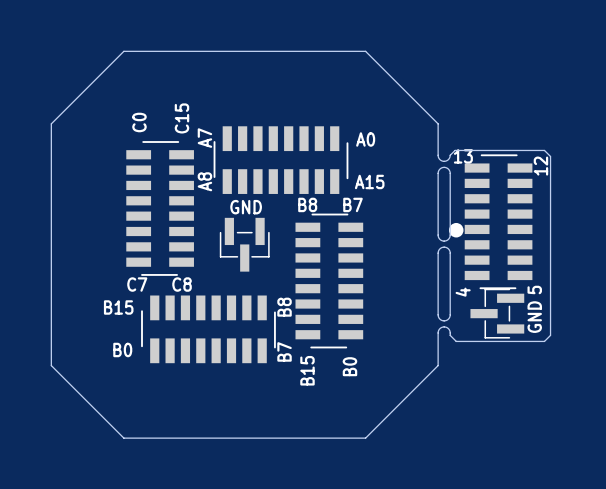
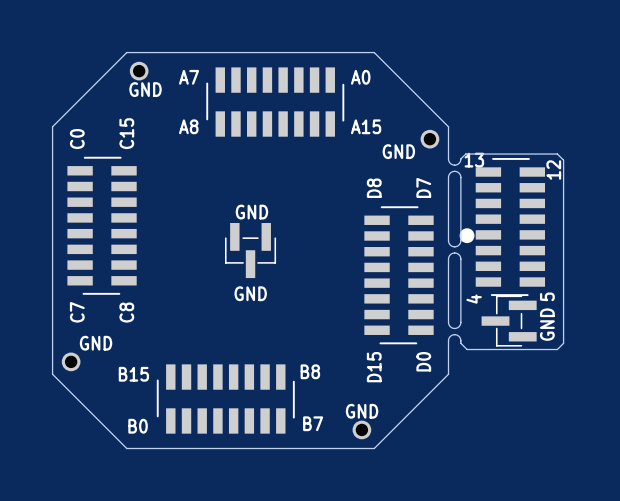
part: none -> (139, 71)
text: none -> GND (145, 89)
text position: C15 (181, 118) -> C15 (126, 133)
text position: C0 (139, 122) -> C0 (77, 139)
part: none -> (429, 139)
text rotation: 0° (204, 138) -> 90° clockwise (189, 77)
text position: A7 (204, 138) -> A7 (189, 77)
text position: A0 (365, 139) -> A0 (360, 77)
text: none -> GND (398, 151)
part position: (280, 160) -> (275, 102)
text rotation: 0° (204, 181) -> 90° clockwise (188, 126)
text position: A8 (204, 181) -> A8 (188, 126)
text position: A15 (369, 181) -> A15 (366, 126)
text: none -> D8 (374, 188)
text: none -> D7 (423, 187)
text: B8 (307, 204) -> none
text: B7 (352, 204) -> none
part position: (160, 208) -> (102, 225)
part position: (329, 280) -> (399, 275)
text rotation: 0° (137, 284) -> 90° counterclockwise (77, 312)
text position: C7 (137, 284) -> C7 (77, 312)
text rotation: 0° (182, 284) -> 90° counterclockwise (126, 312)
text position: C8 (182, 284) -> C8 (126, 312)
text: none -> GND (250, 293)
text position: B15 (118, 307) -> B15 (133, 374)
text rotation: 0° (284, 307) -> 90° clockwise (310, 371)
text position: B8 (284, 307) -> B8 (310, 371)
part position: (208, 329) -> (225, 399)
text: none -> GND (96, 343)
text position: B0 (122, 349) -> B0 (138, 426)
text rotation: 0° (284, 351) -> 90° clockwise (313, 423)
text position: B7 (284, 351) -> B7 (313, 423)
part: none -> (71, 361)
text: none -> D0 (423, 361)
text: none -> D15 (374, 367)
text: B0 (349, 366) -> none
text: B15 (307, 370) -> none
text: none -> GND (362, 411)
part: none -> (361, 429)

